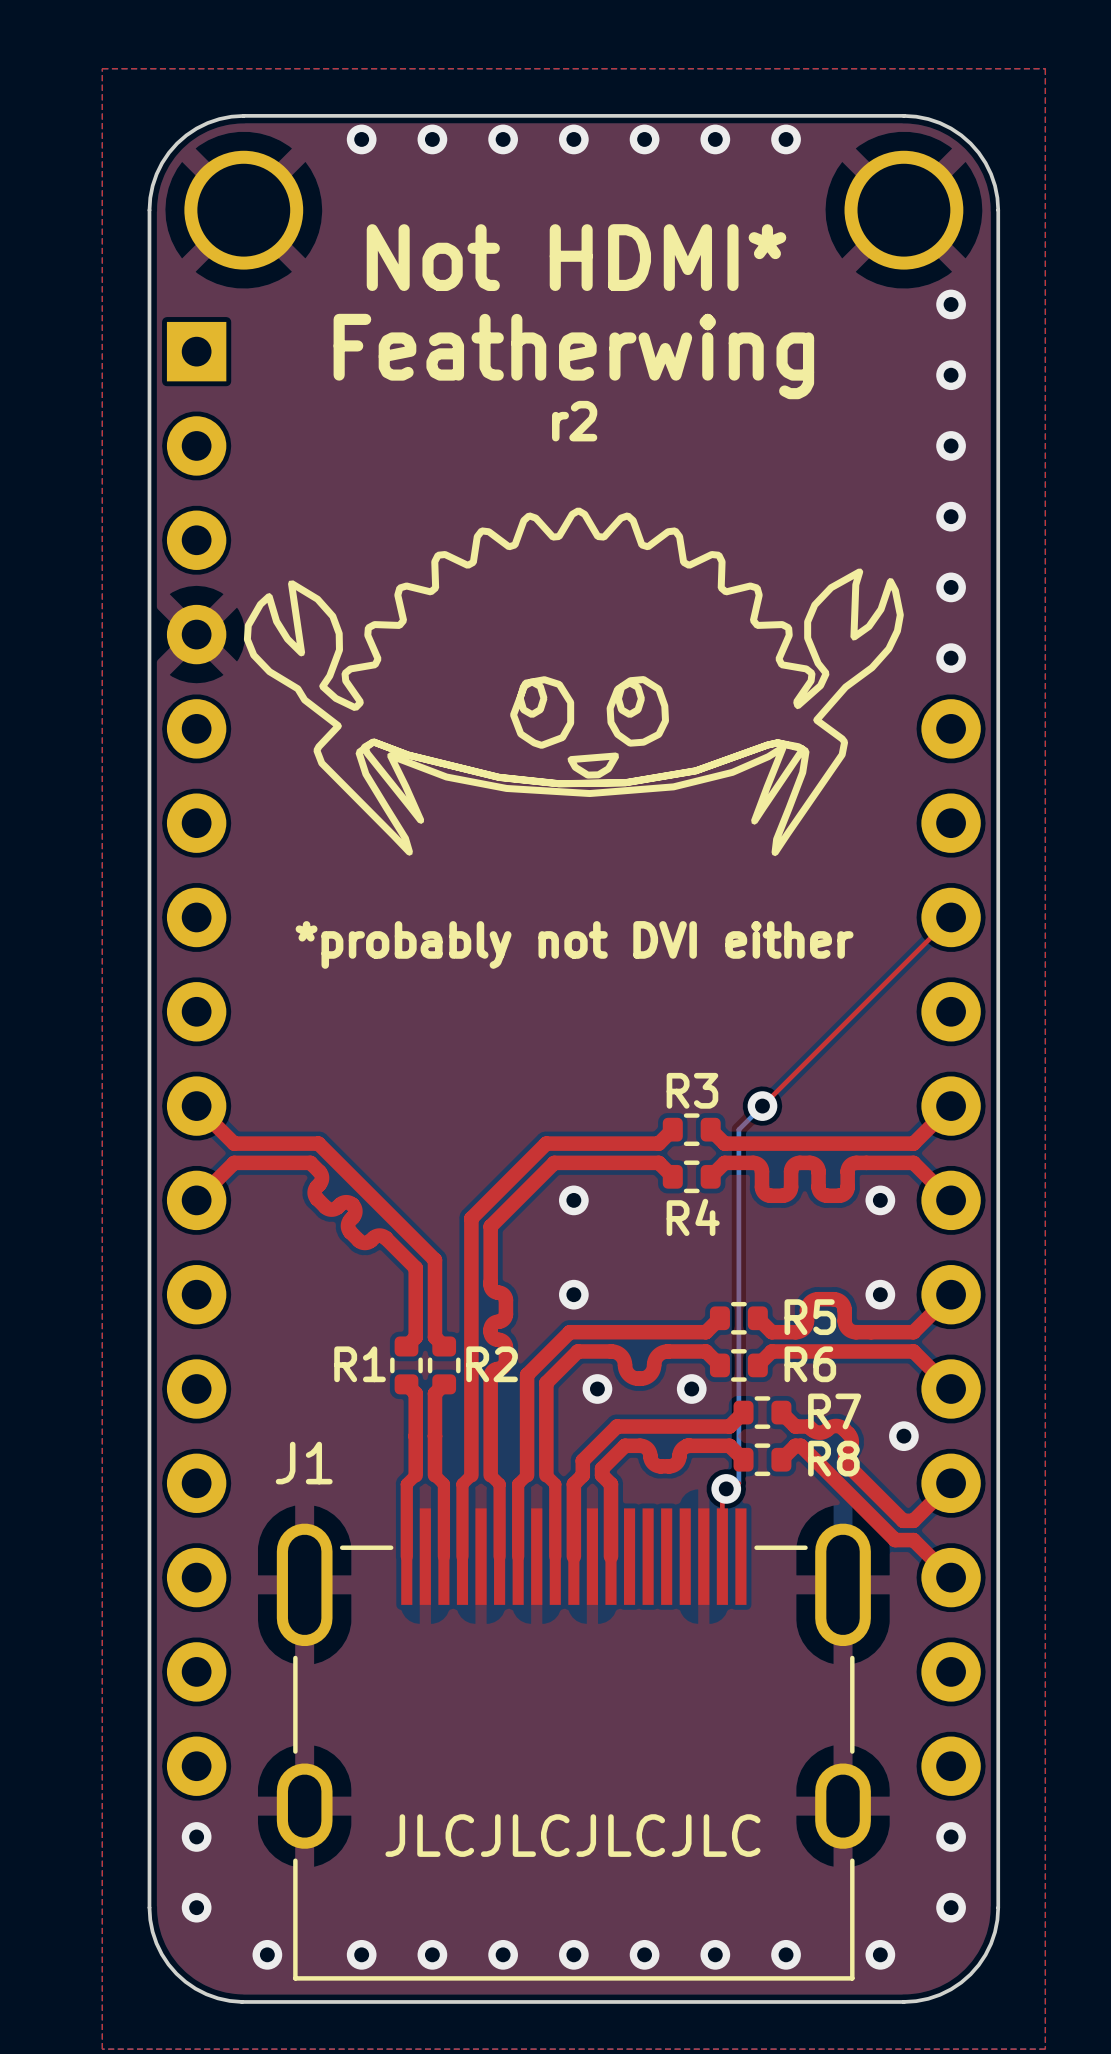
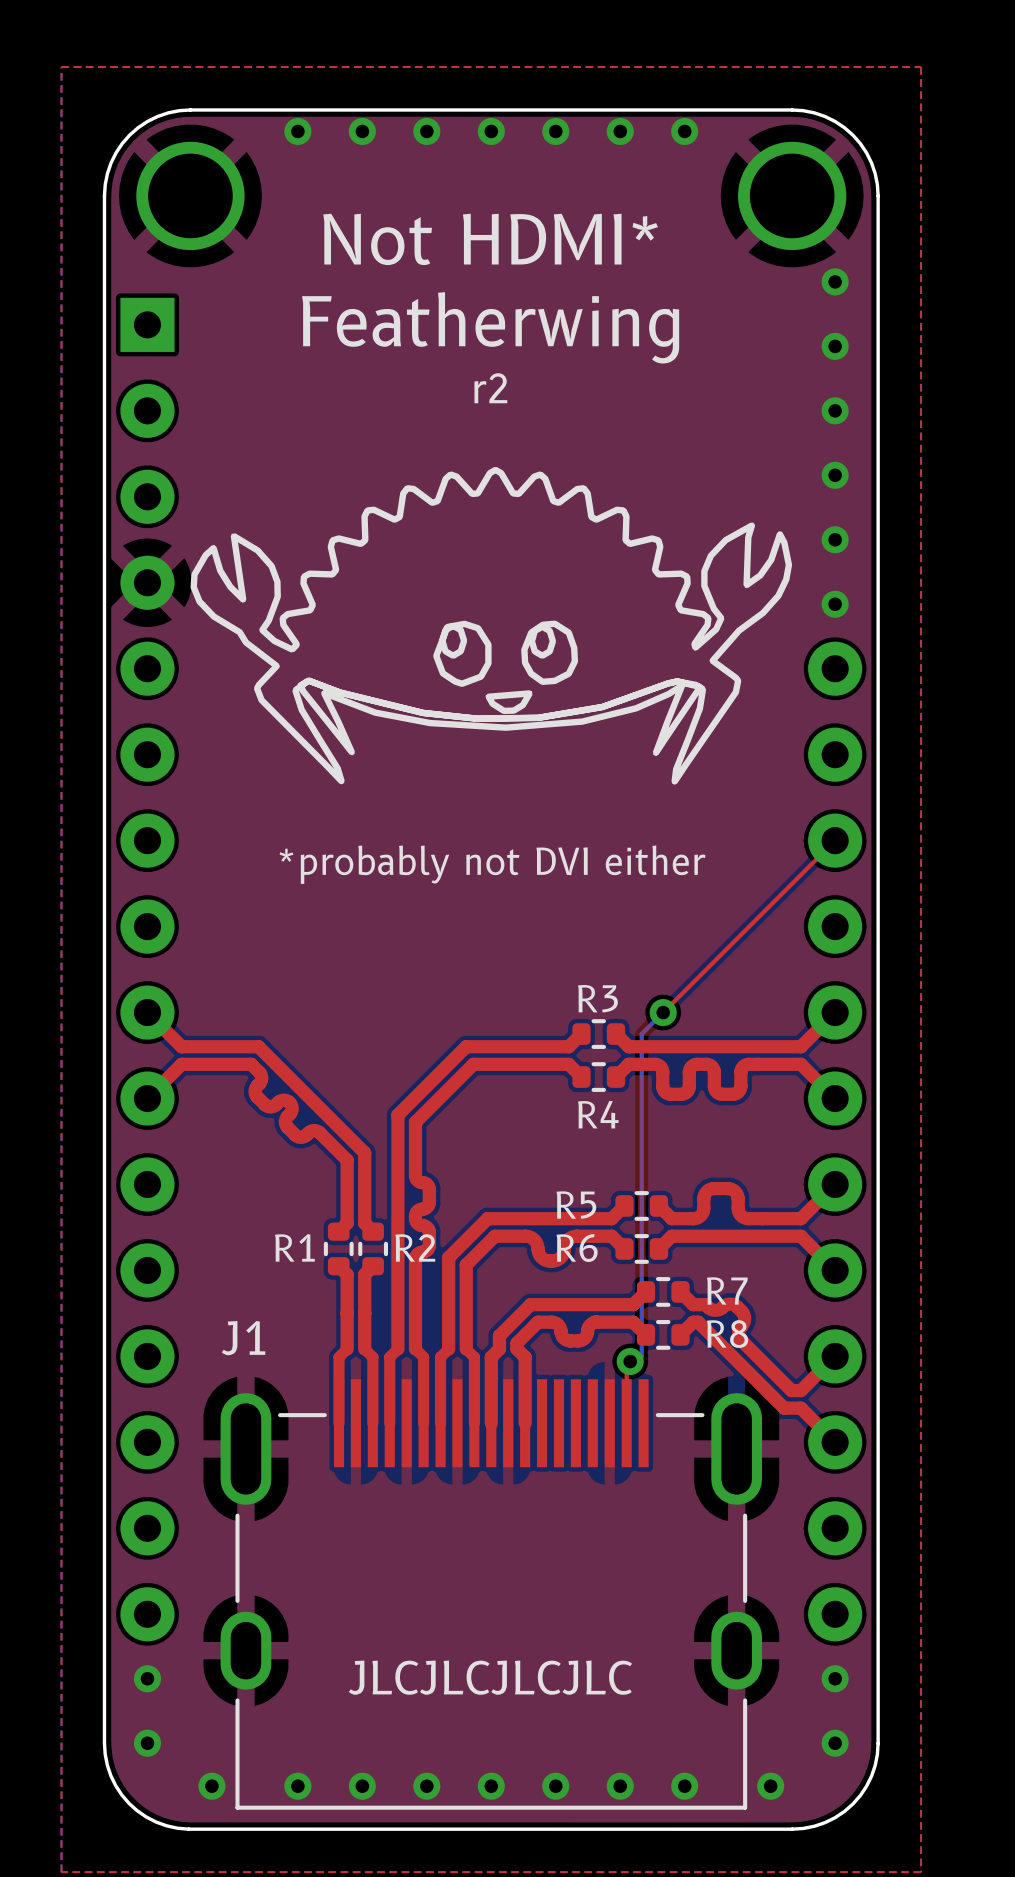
via: (573, 1200) -> none
via: (880, 1200) -> none
via: (573, 1294) -> none
via: (880, 1294) -> none
R5 name position: R5 (810, 1317) -> R5 (576, 1205)
R6 name position: R6 (810, 1364) -> R6 (577, 1248)
via: (597, 1389) -> none
via: (691, 1389) -> none
via: (903, 1436) -> none

